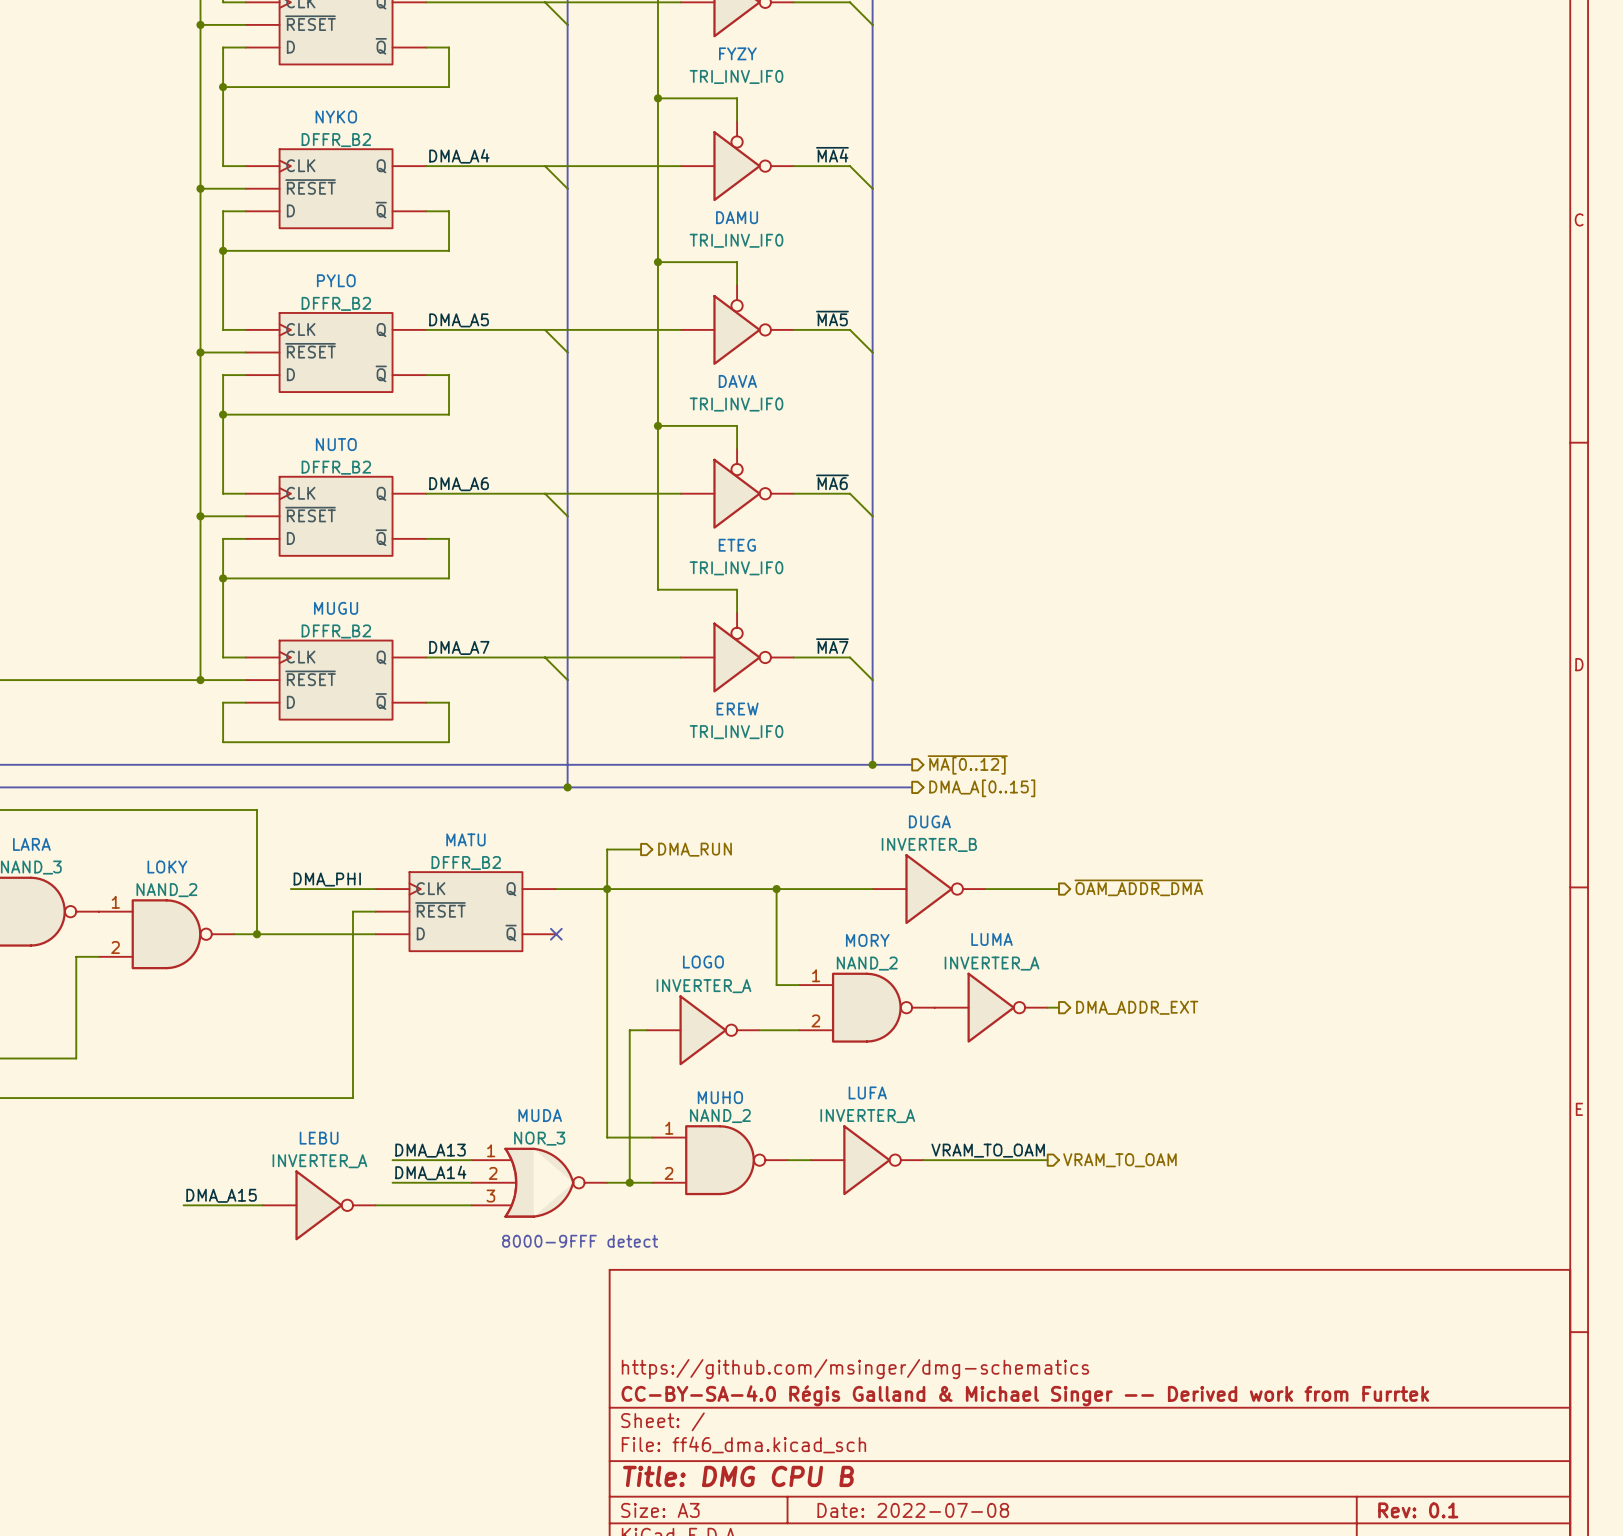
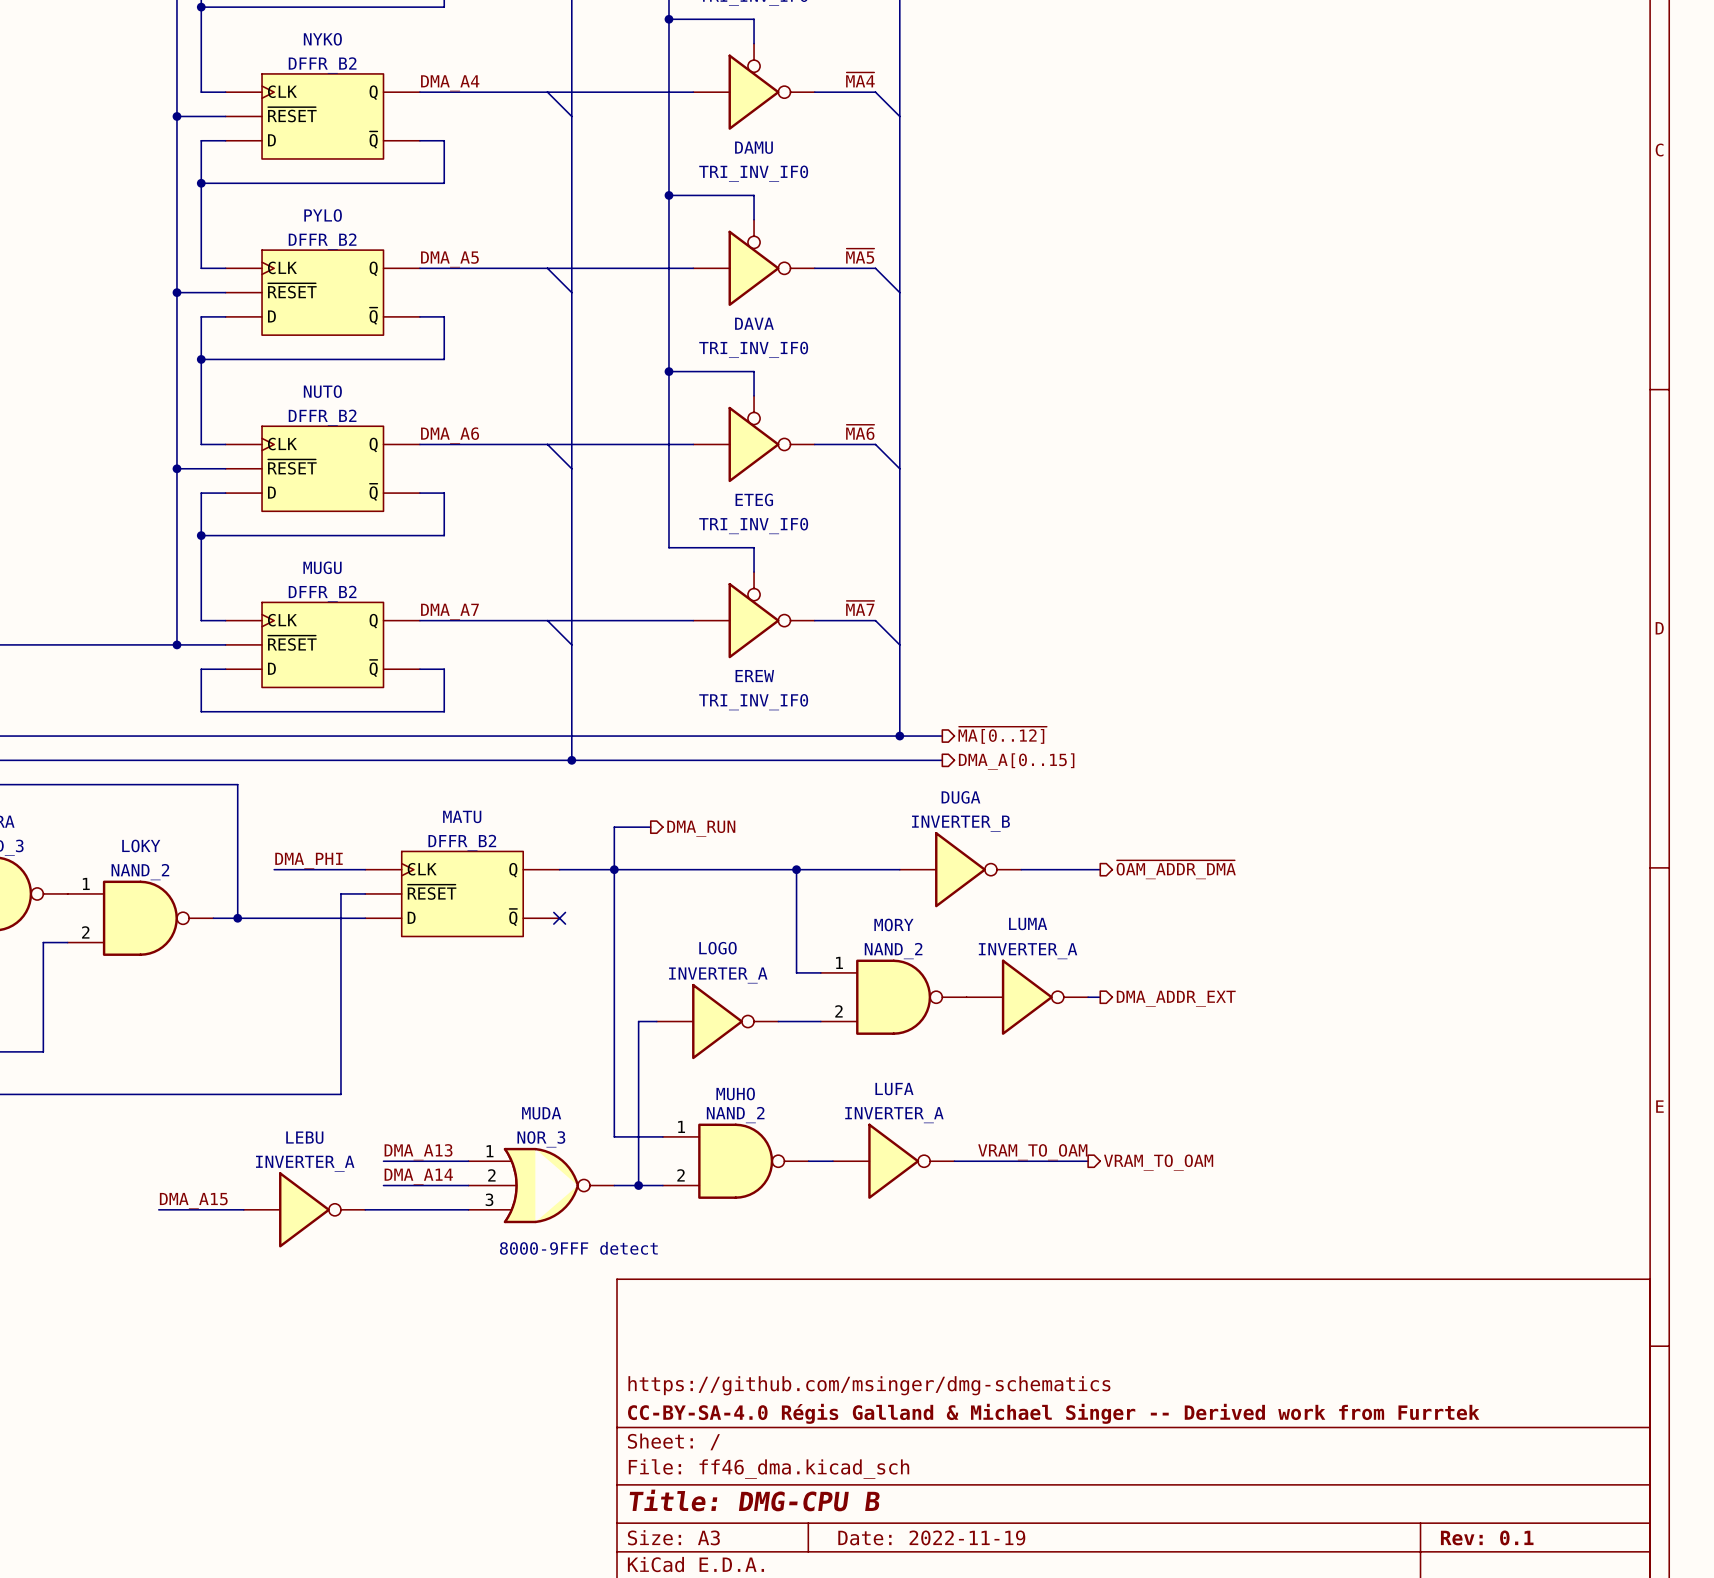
title block: Title: DMG CPU B (738, 1476) -> Title: DMG-CPU B (754, 1500)
title block: Date: 2022-07-08 (913, 1510) -> Date: 2022-11-19 (931, 1537)

